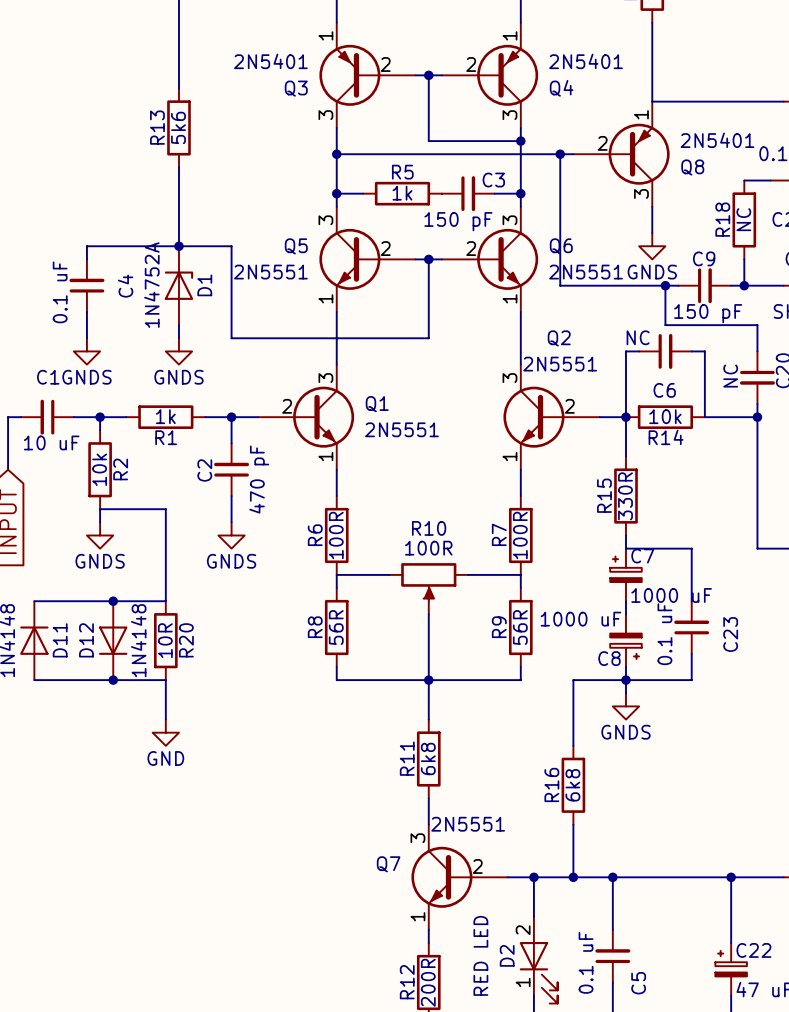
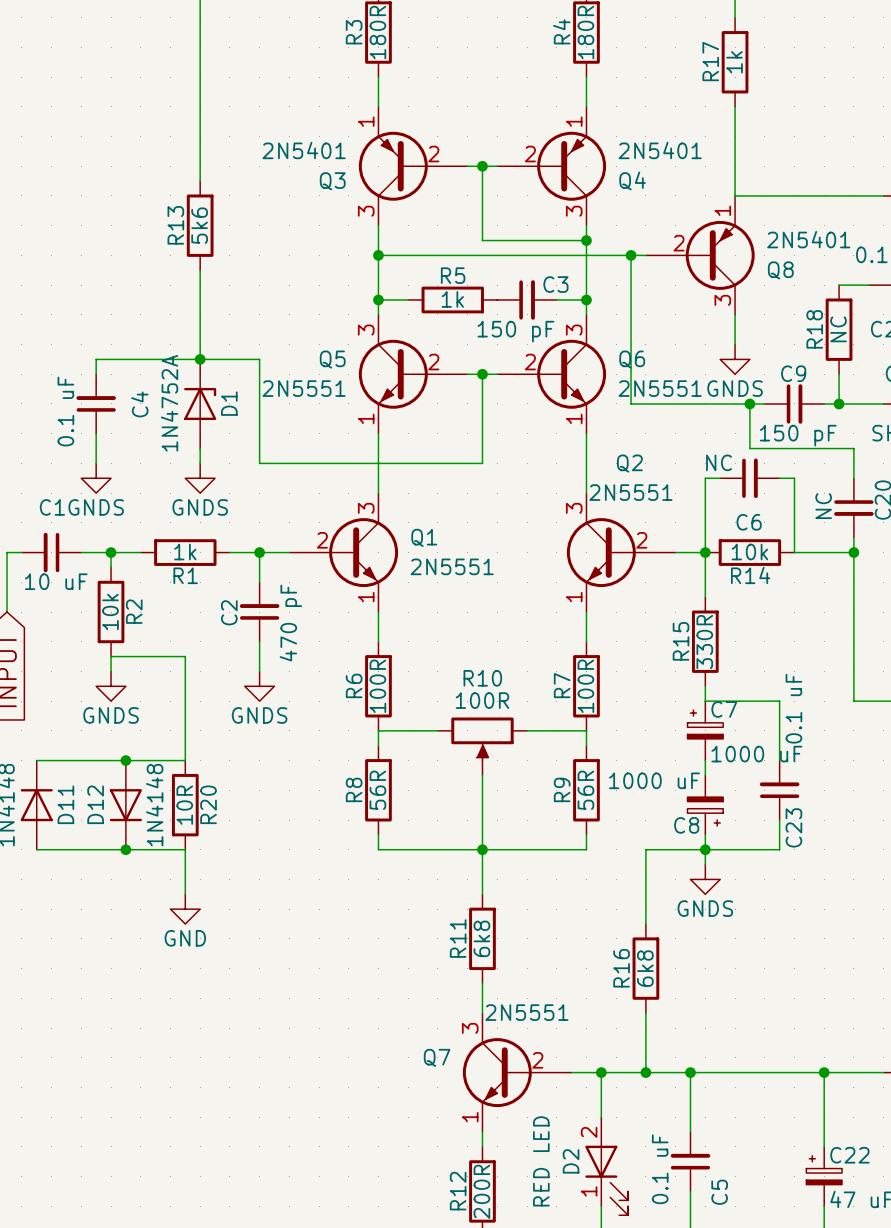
C23 value position: 0.1 uF (664, 634) -> 0.1 uF (793, 708)
C23 name position: C23 (730, 634) -> C23 (793, 827)

